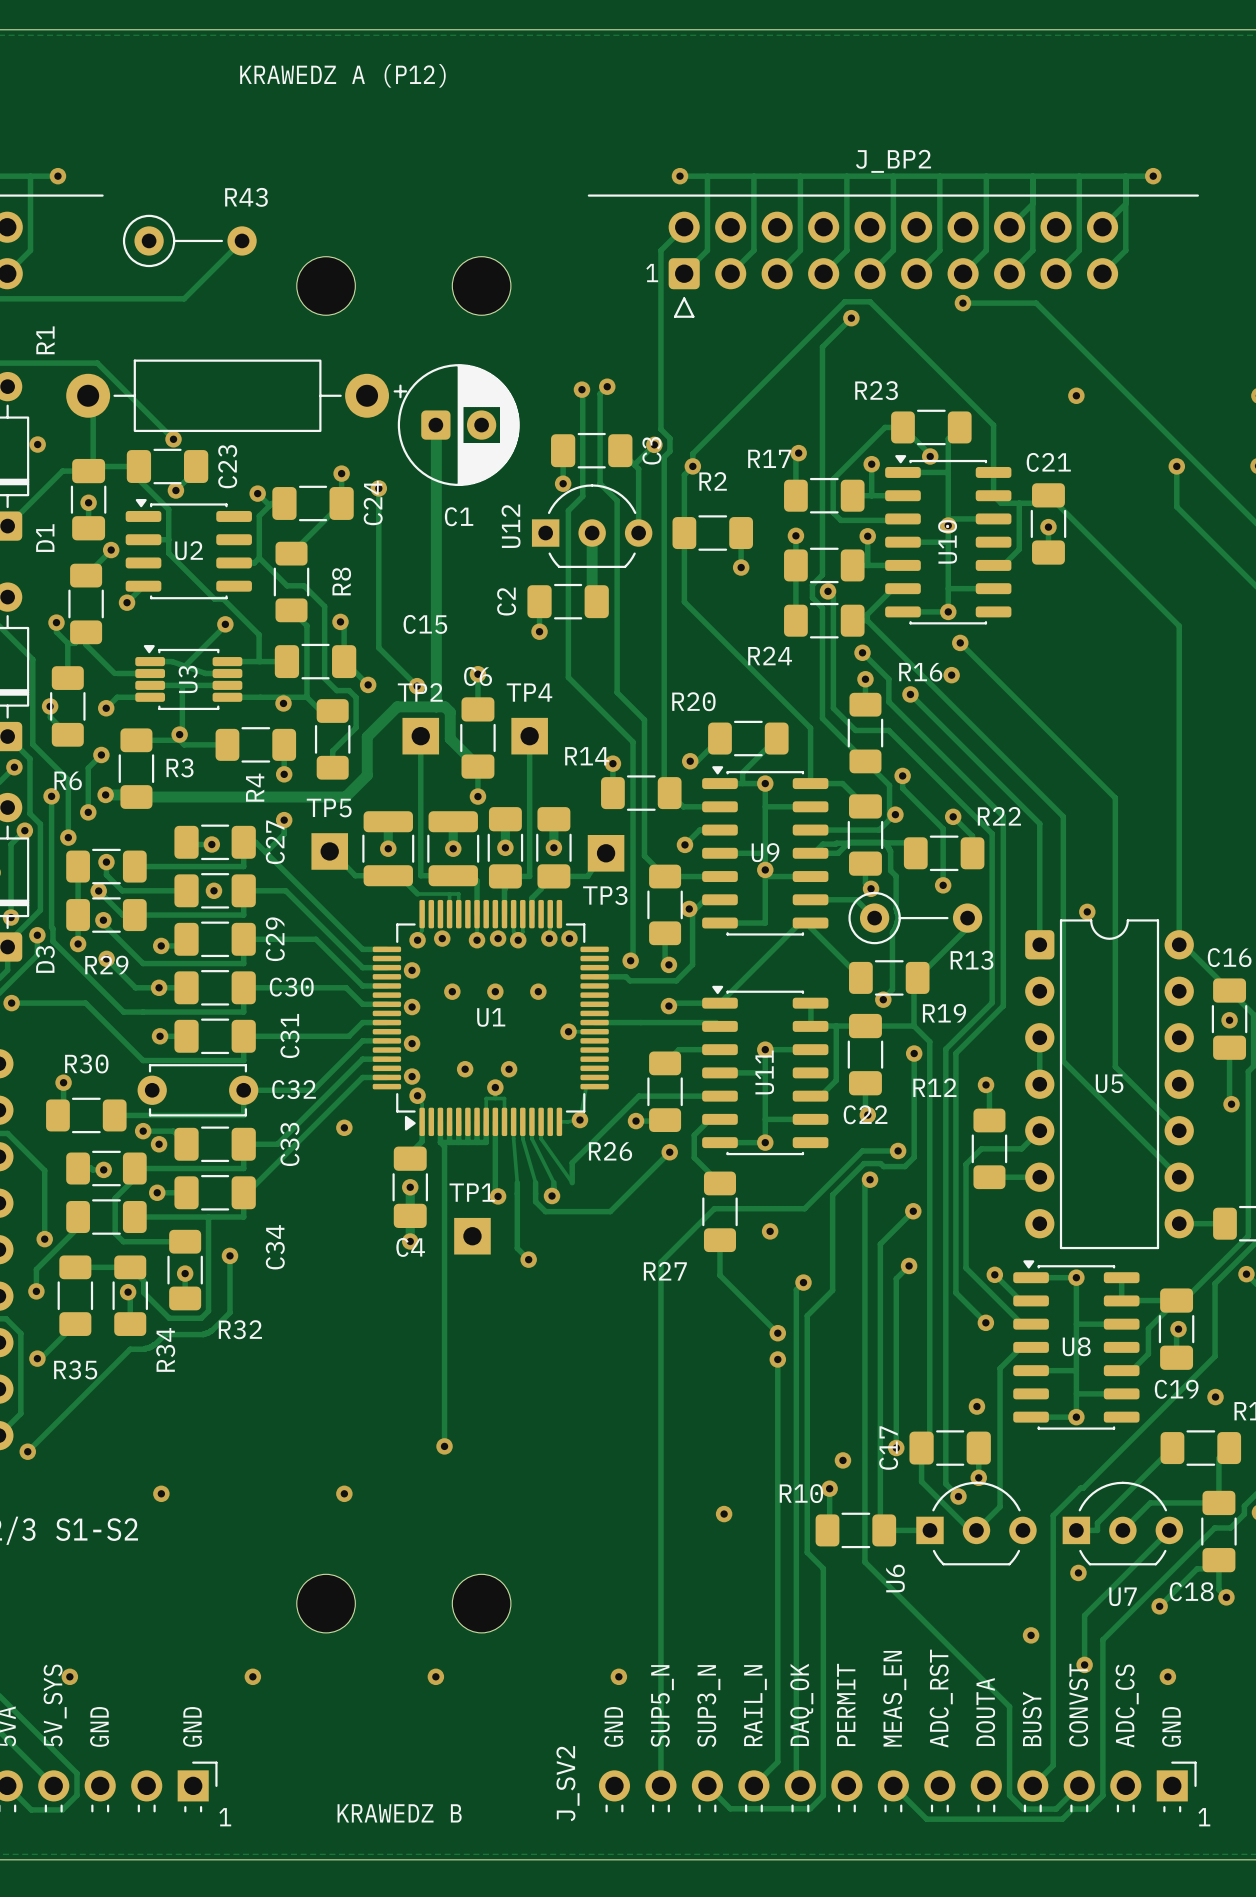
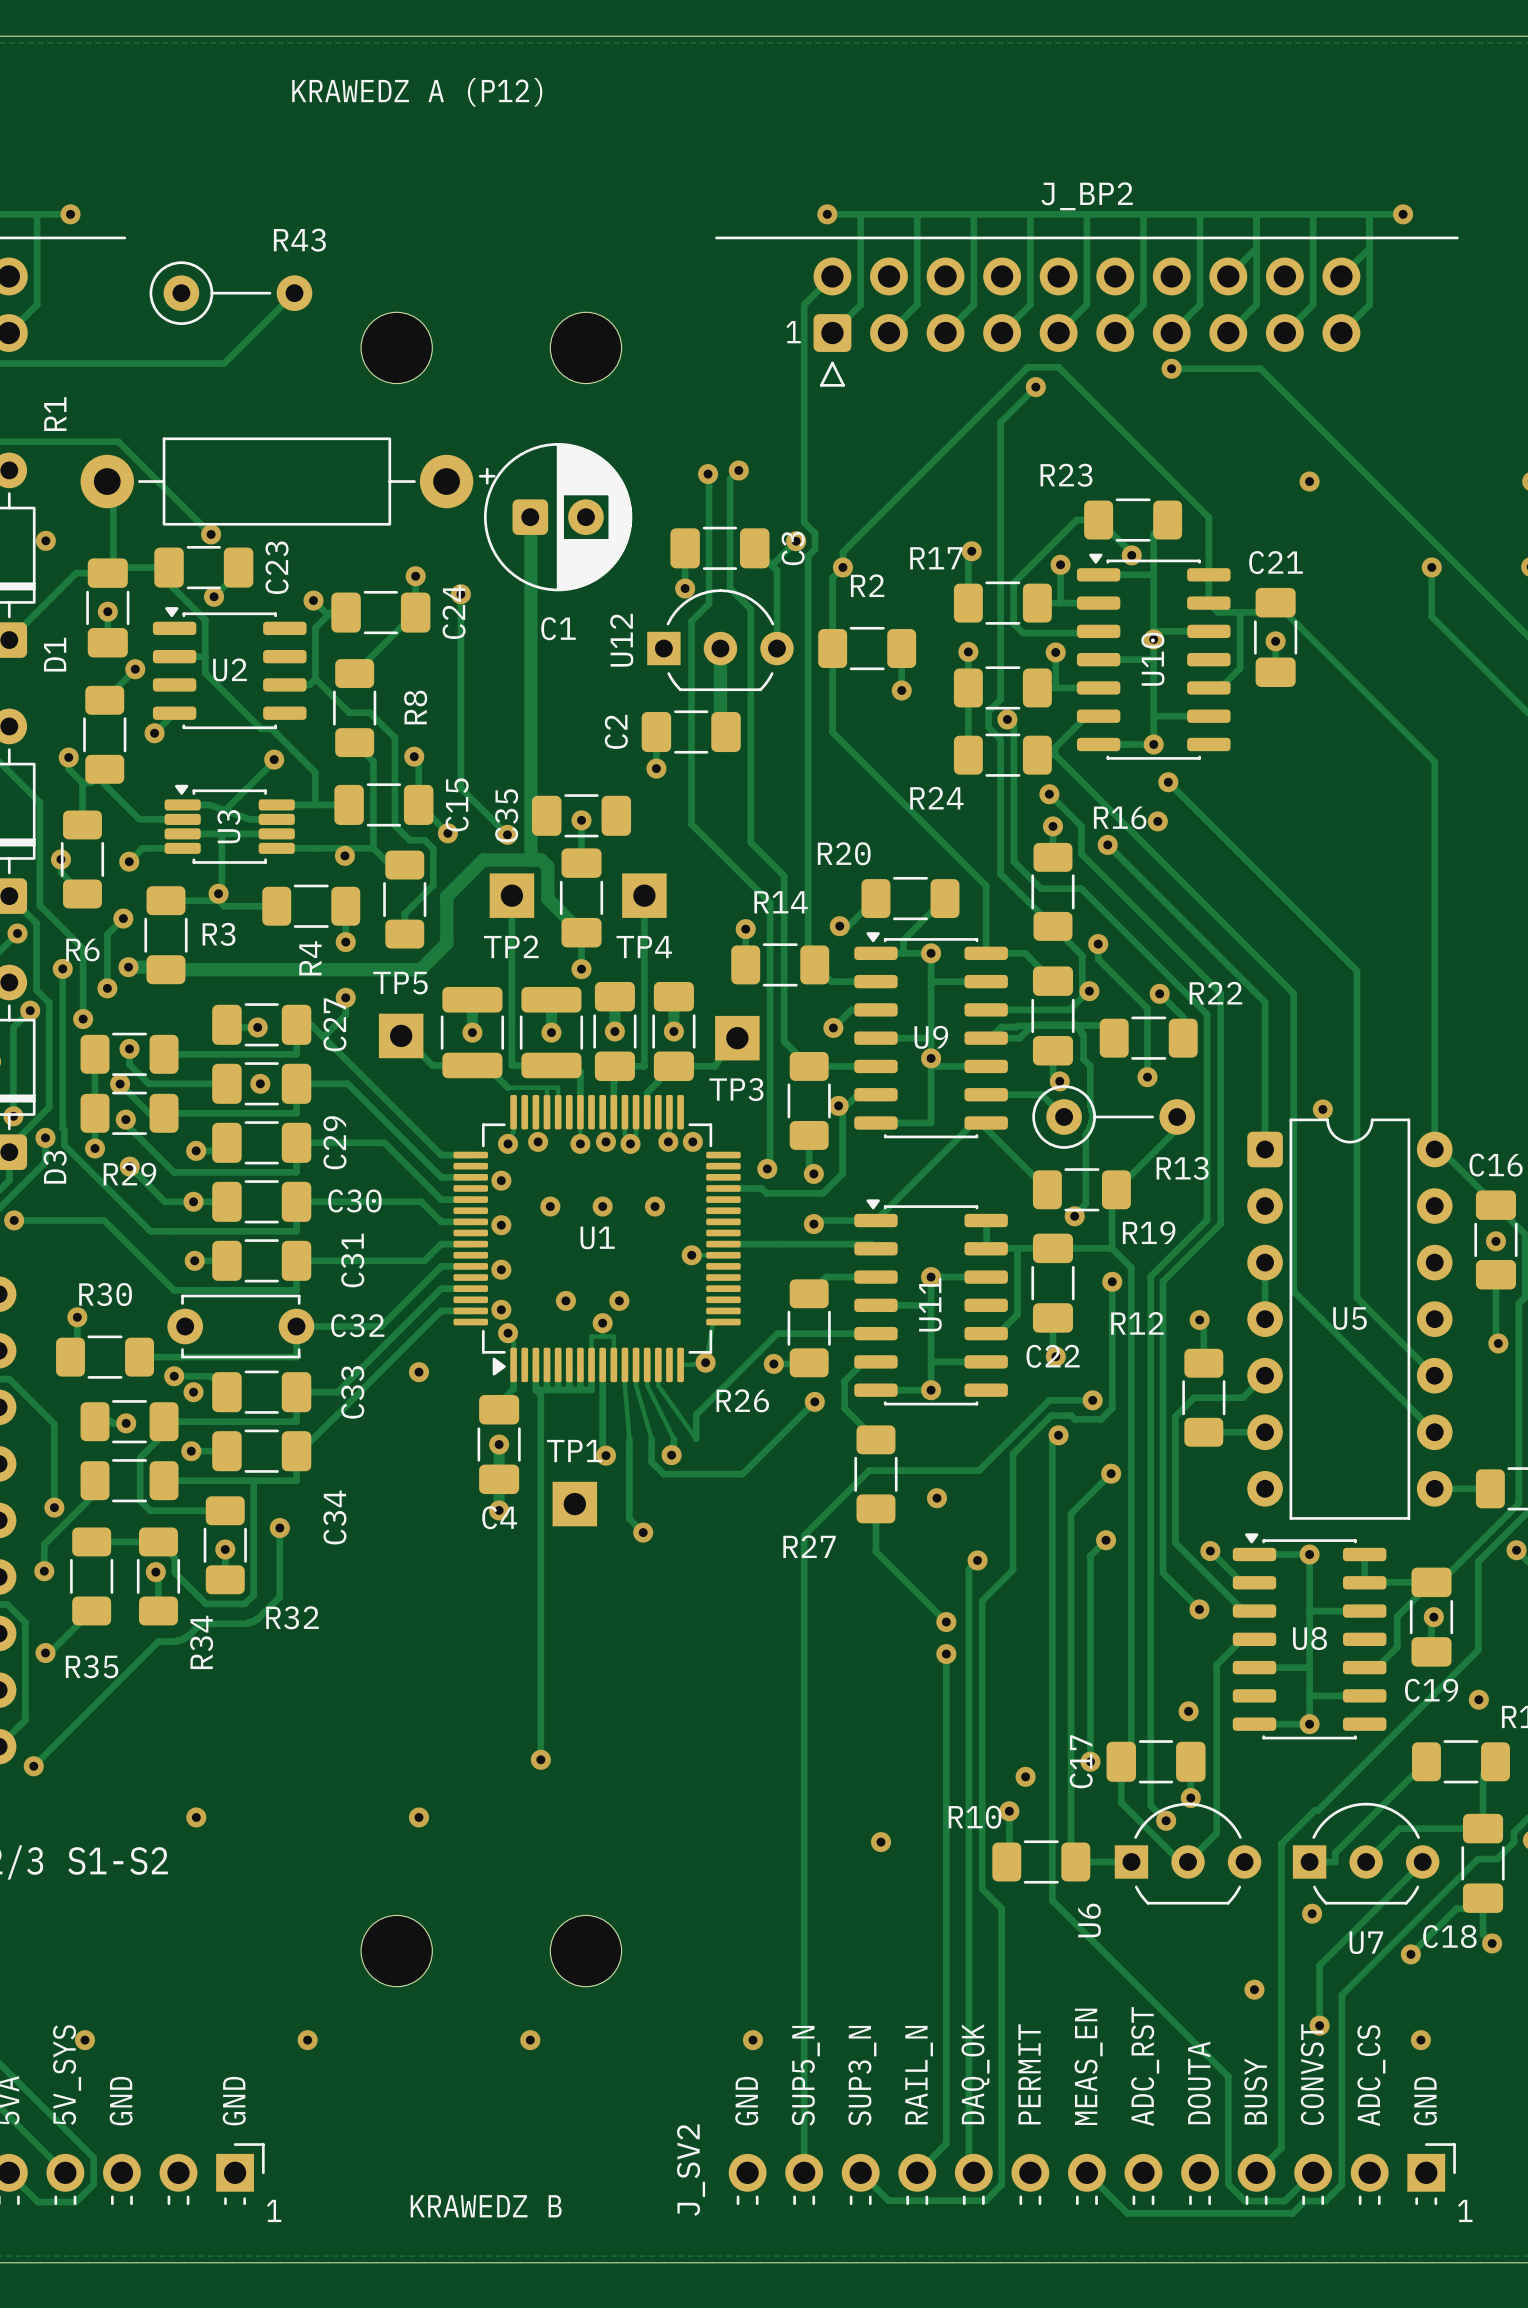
C15 name rotation: 0° (425, 624) -> 90° counterclockwise (457, 804)
C35: none -> (581, 815)
C6 name: C6 (478, 676) -> none
TP2 name position: TP2 (420, 692) -> TP2 (511, 946)
TP4 name position: TP4 (529, 692) -> TP4 (644, 947)
R14 name position: R14 (587, 756) -> R14 (781, 902)

